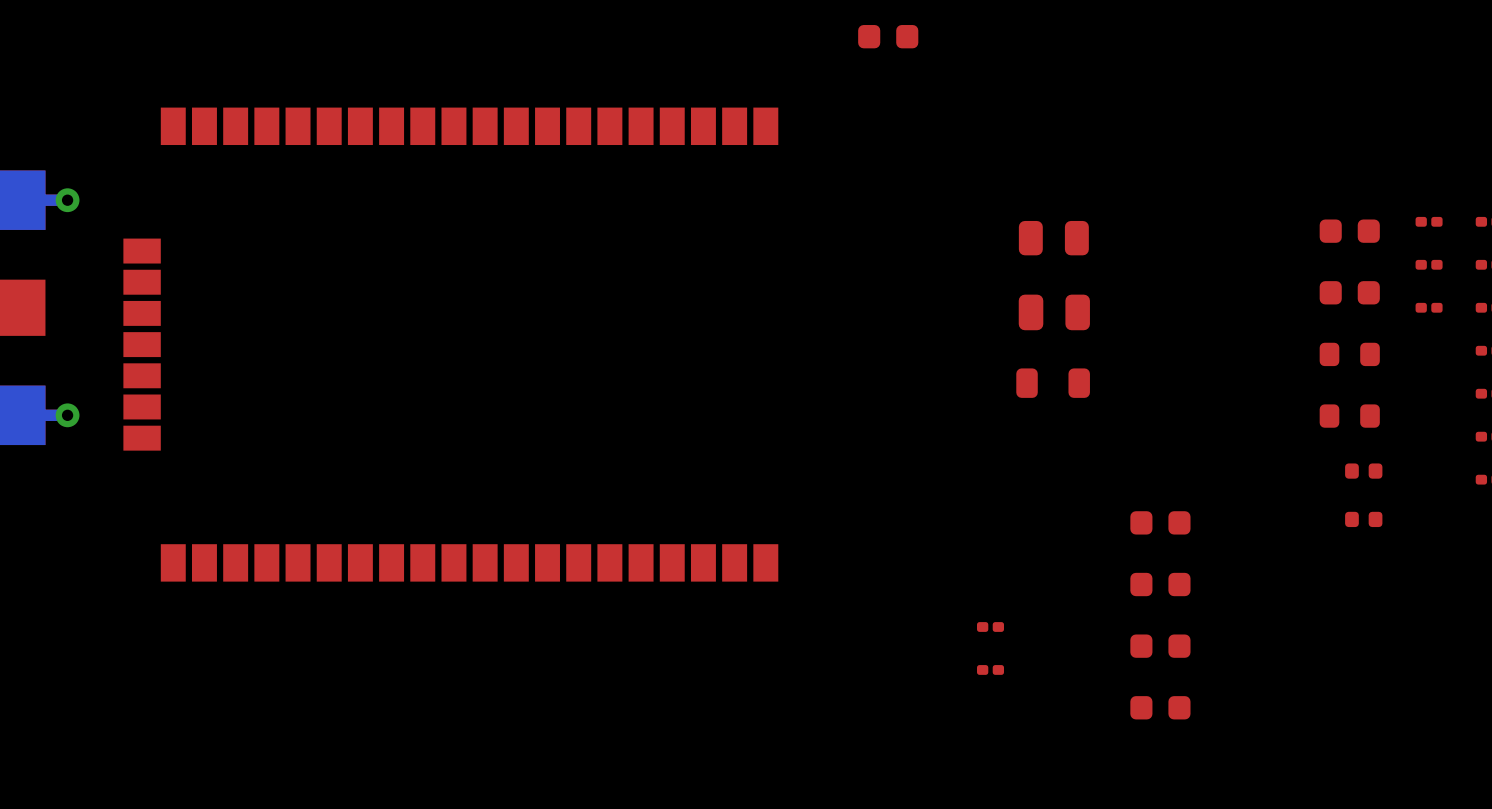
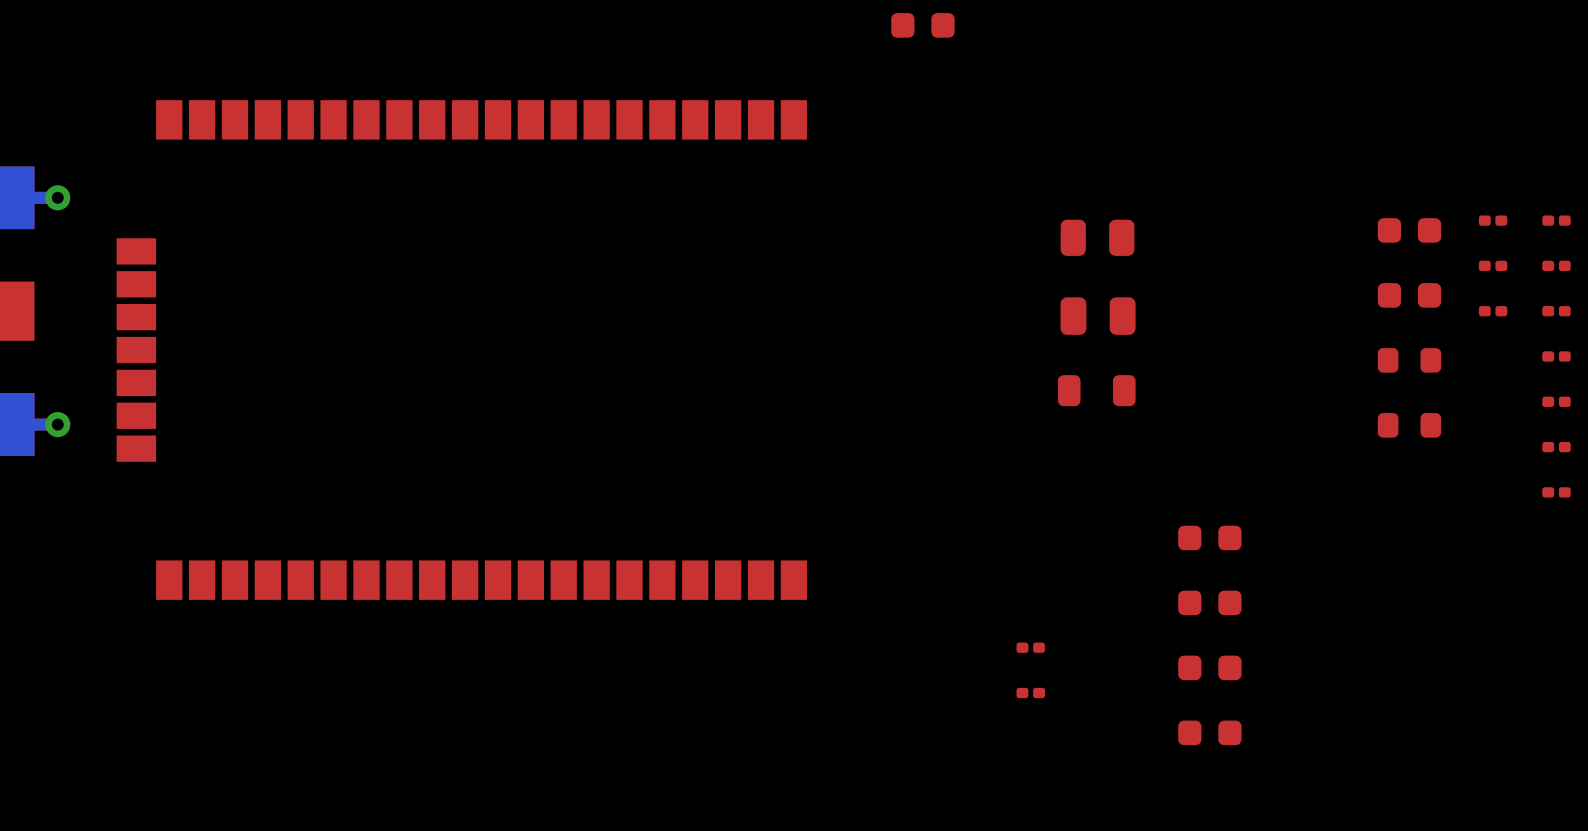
part: (1363, 471) -> none
part: (1363, 519) -> none

